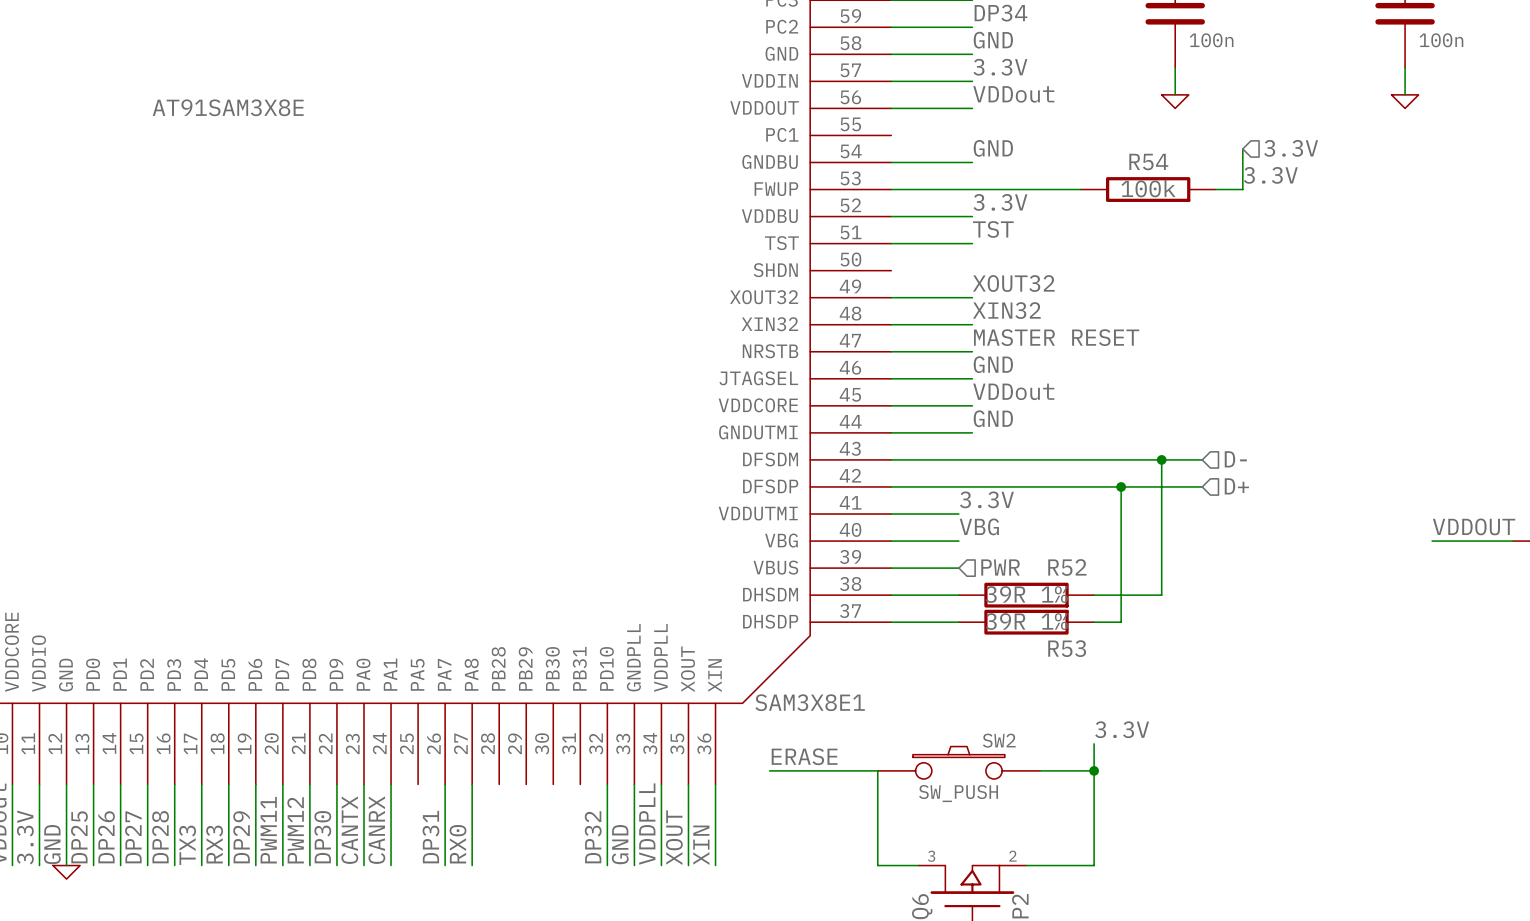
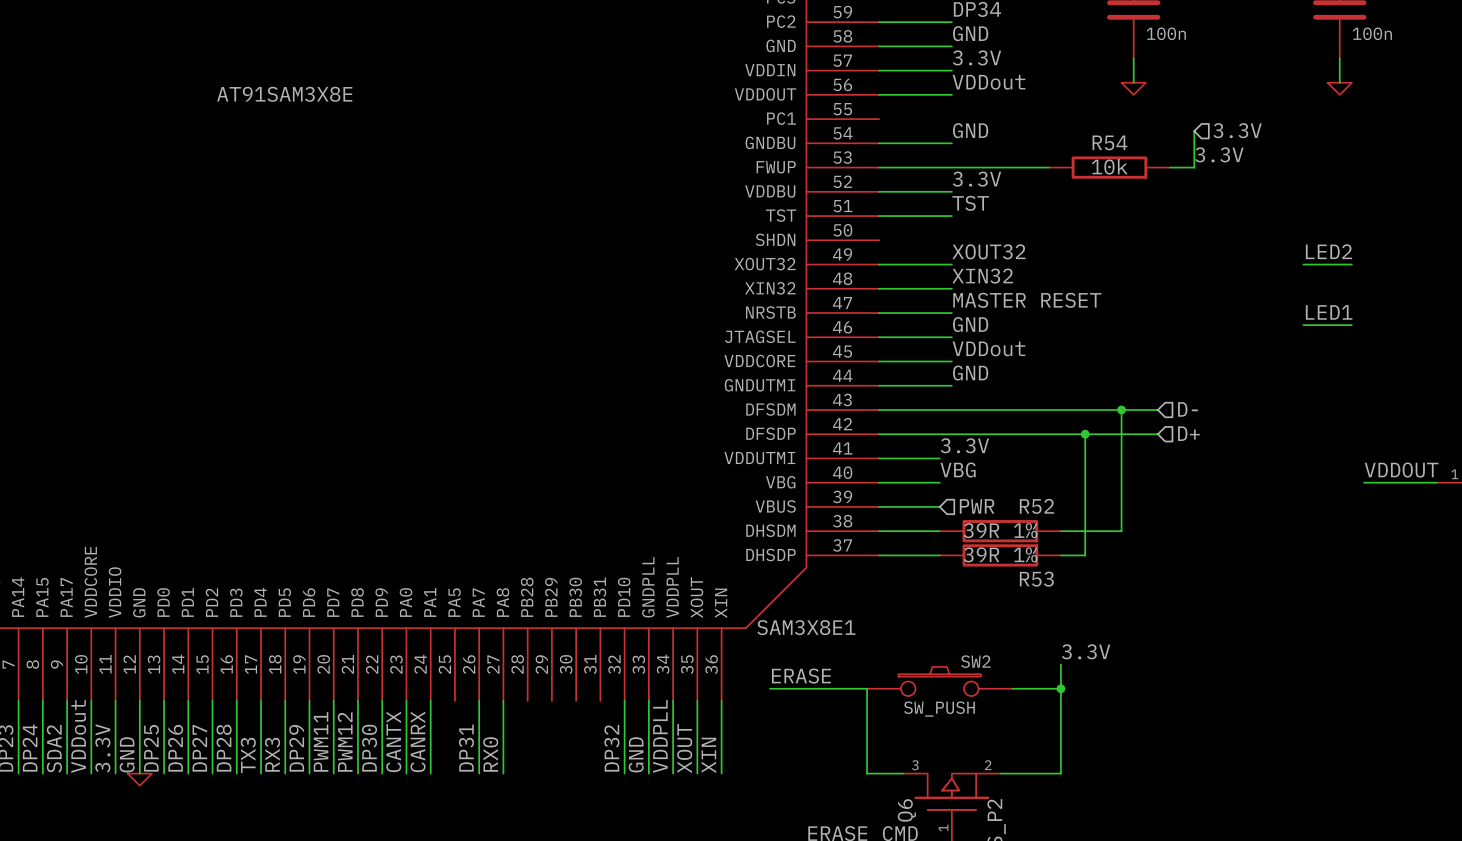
R54 value: 100k (1148, 188) -> 10k (1109, 166)
label: none -> LED2 (1328, 251)
wire: none -> (1303, 264) (1351, 264)
label: none -> LED1 (1329, 312)
wire: none -> (1303, 325) (1351, 325)

